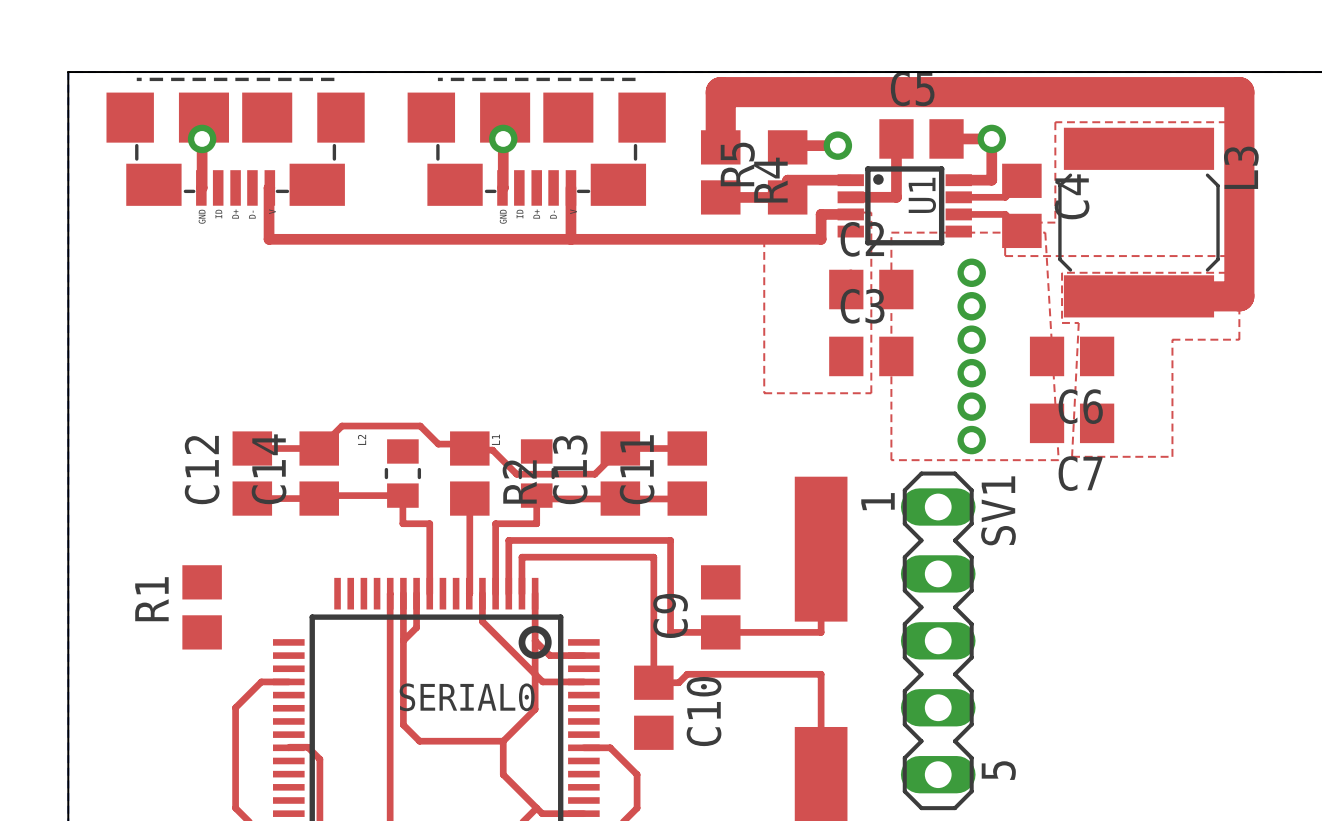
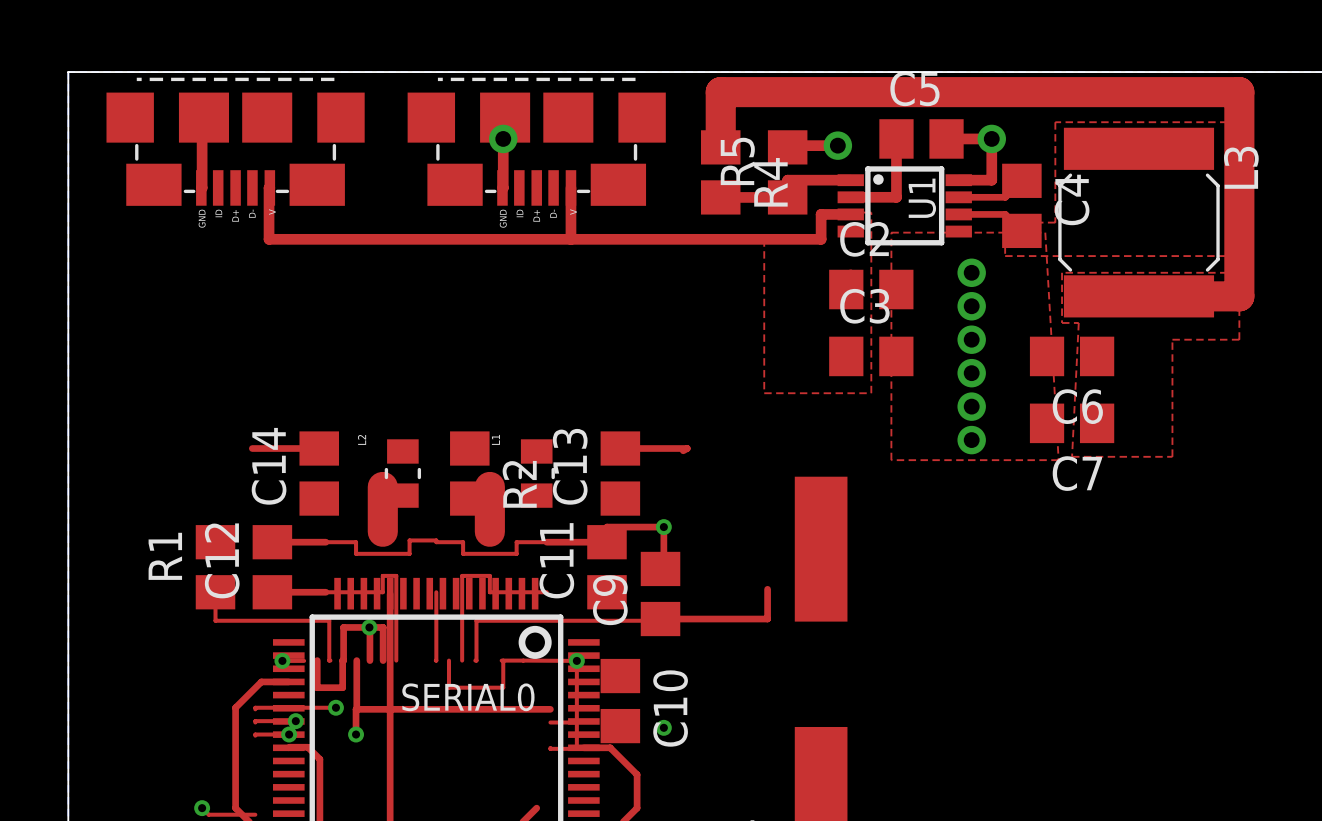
via: (202, 138) -> none
top track: (318, 450) (341, 426) (420, 426) (438, 444) (468, 444) (469, 448) (474, 450) (492, 450) (516, 474) (594, 474) (620, 448) (623, 450) -> none
C12 position: (252, 473) -> (272, 567)
C11 position: (687, 473) -> (606, 567)
top track: none -> (382, 486) (382, 531)
top track: none -> (489, 486) (489, 531)
top track: (252, 498) (319, 498) (322, 495) (402, 495) (402, 523) (429, 523) (429, 593) -> none
top track: (469, 498) (469, 593) -> none
top track: (683, 498) (687, 498) (536, 498) (536, 523) (495, 523) (495, 593) -> none
via: none -> (663, 527)
top track: none -> (272, 542) (356, 542) (356, 553) (409, 553) (409, 540) (436, 540) (436, 542) (463, 542) (463, 553) (516, 553) (516, 542) (606, 542) (606, 527) (663, 527) (663, 568) (660, 568)
top track: (821, 549) (821, 632) (670, 632) (670, 540) (508, 540) (508, 593) -> none
top track: none -> (767, 589) (767, 619) (476, 620) (475, 660)
top track: none -> (215, 592) (215, 620) (329, 620) (330, 660)
top track: none -> (272, 592) (382, 592) (382, 575) (396, 575) (396, 660)
top track: none -> (436, 592) (435, 660)
top track: none -> (546, 592) (489, 592) (489, 575) (462, 575) (462, 660)
top track: (403, 593) (403, 725) (419, 741) (503, 741) -> none
top track: (416, 593) (416, 627) (403, 640) -> none
top track: (482, 593) (482, 621) (542, 681) (583, 681) -> none
top track: (521, 593) (521, 557) (653, 557) (653, 682) (678, 682) (687, 674) (821, 674) (821, 799) -> none
top track: (535, 593) (535, 709) (503, 741) -> none
R1 position: (202, 607) -> (215, 567)
C9 position: (720, 607) -> (660, 593)
top track: none -> (369, 627) (369, 660)
via: none -> (369, 627)
top track: (535, 640) (549, 655) (583, 655) -> none
SV1: (938, 640) -> none
top track: none -> (282, 660) (304, 660)
via: none -> (282, 660)
top track: none -> (317, 660) (317, 687) (342, 687) (343, 627) (383, 627) (383, 660)
top track: none -> (356, 660) (356, 709)
top track: none -> (448, 660) (448, 687) (503, 687) (503, 660)
top track: none -> (501, 660) (576, 660) (576, 748) (550, 747)
via: none -> (576, 660)
top track: none -> (335, 707) (255, 707) (255, 709)
via: none -> (335, 707)
C10 position: (653, 707) -> (620, 701)
top track: none -> (550, 709) (356, 709) (356, 734)
top track: none -> (295, 721) (255, 722)
via: none -> (295, 721)
top track: none -> (550, 722) (576, 722)
via: none -> (663, 727)
top track: none -> (289, 734) (255, 735)
via: none -> (289, 734)
via: none -> (356, 734)
top track: (503, 741) (503, 774) (542, 813) (583, 813) -> none
top track: none -> (202, 808) (208, 814) (255, 814)
via: none -> (202, 808)

